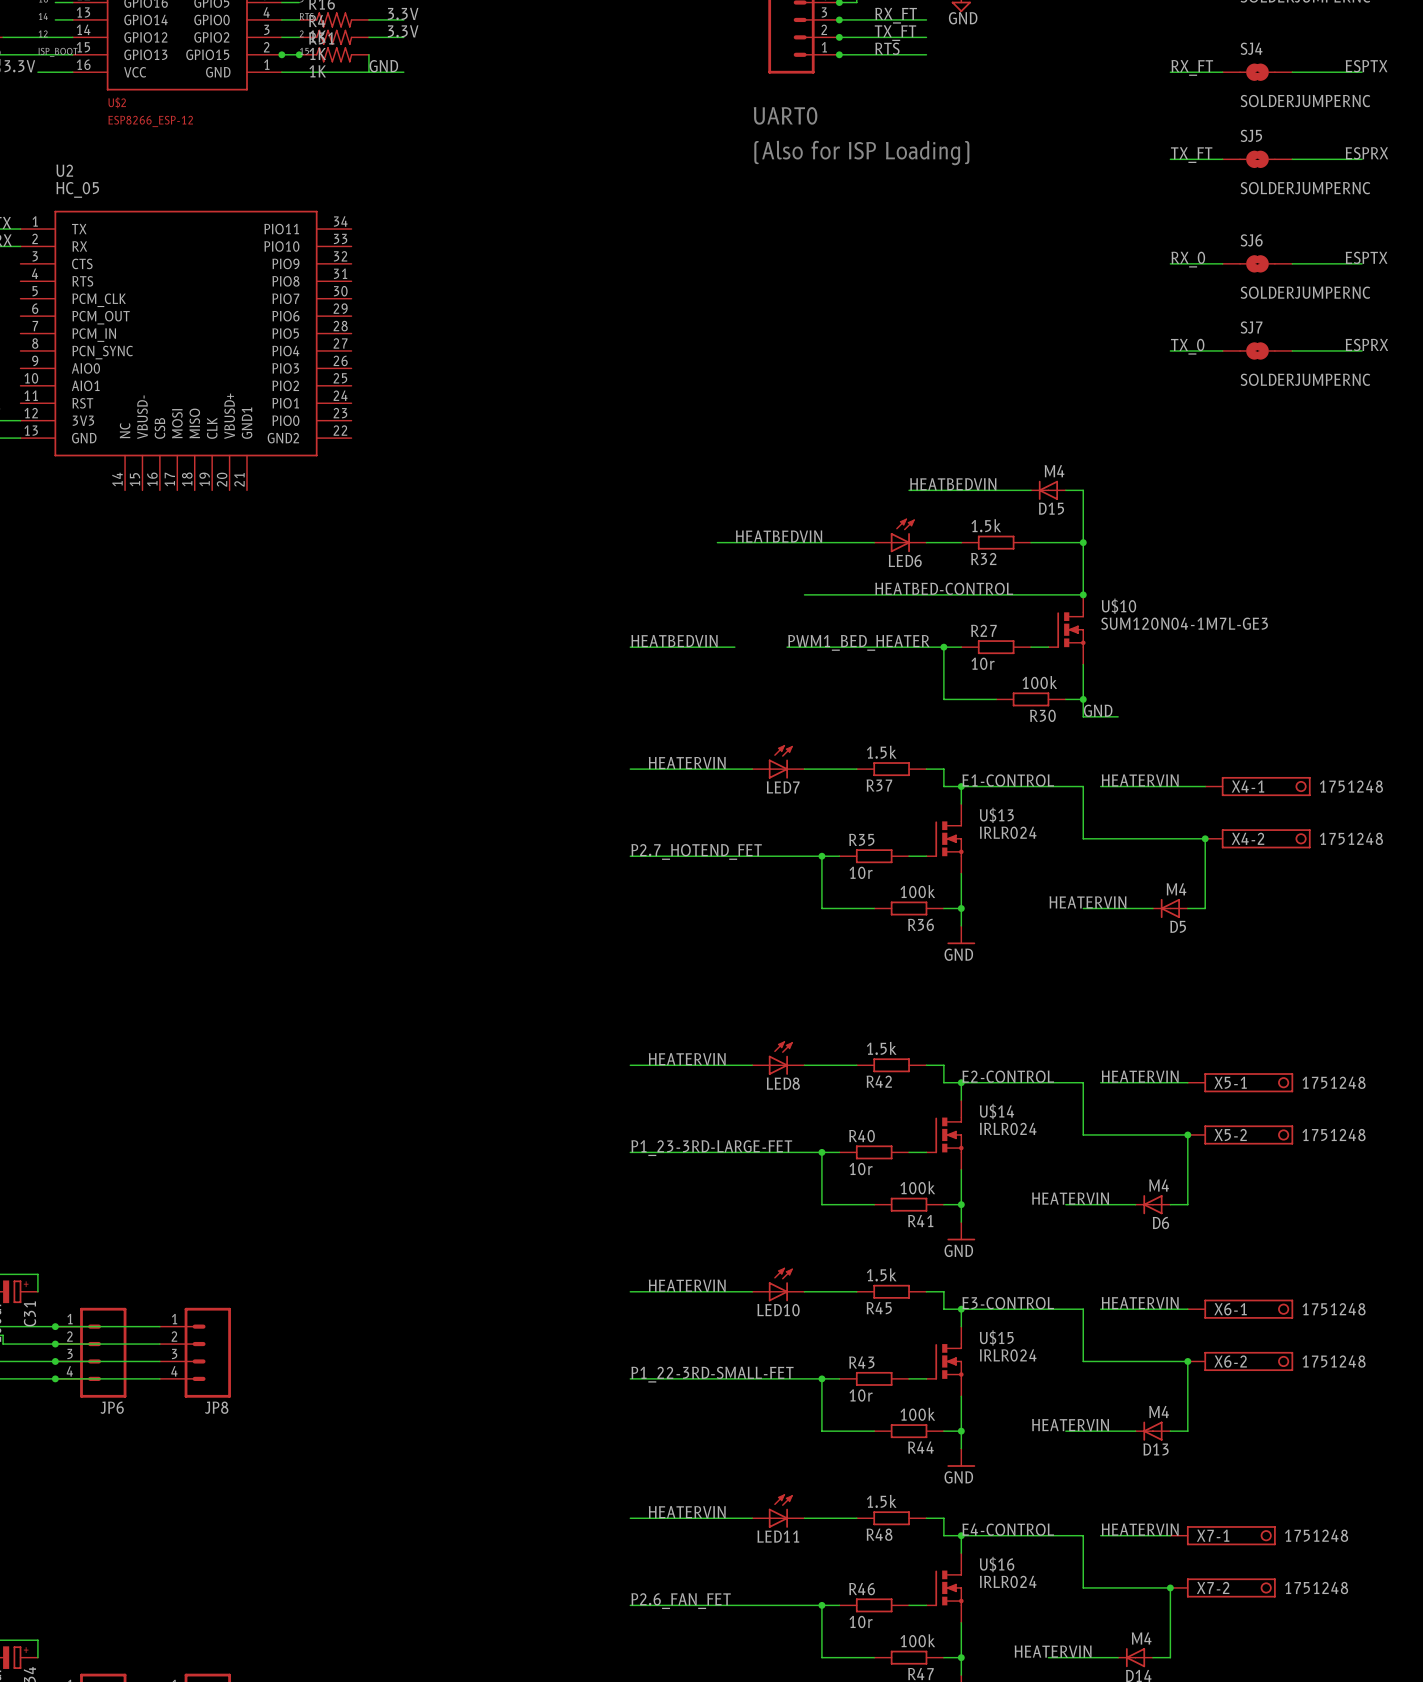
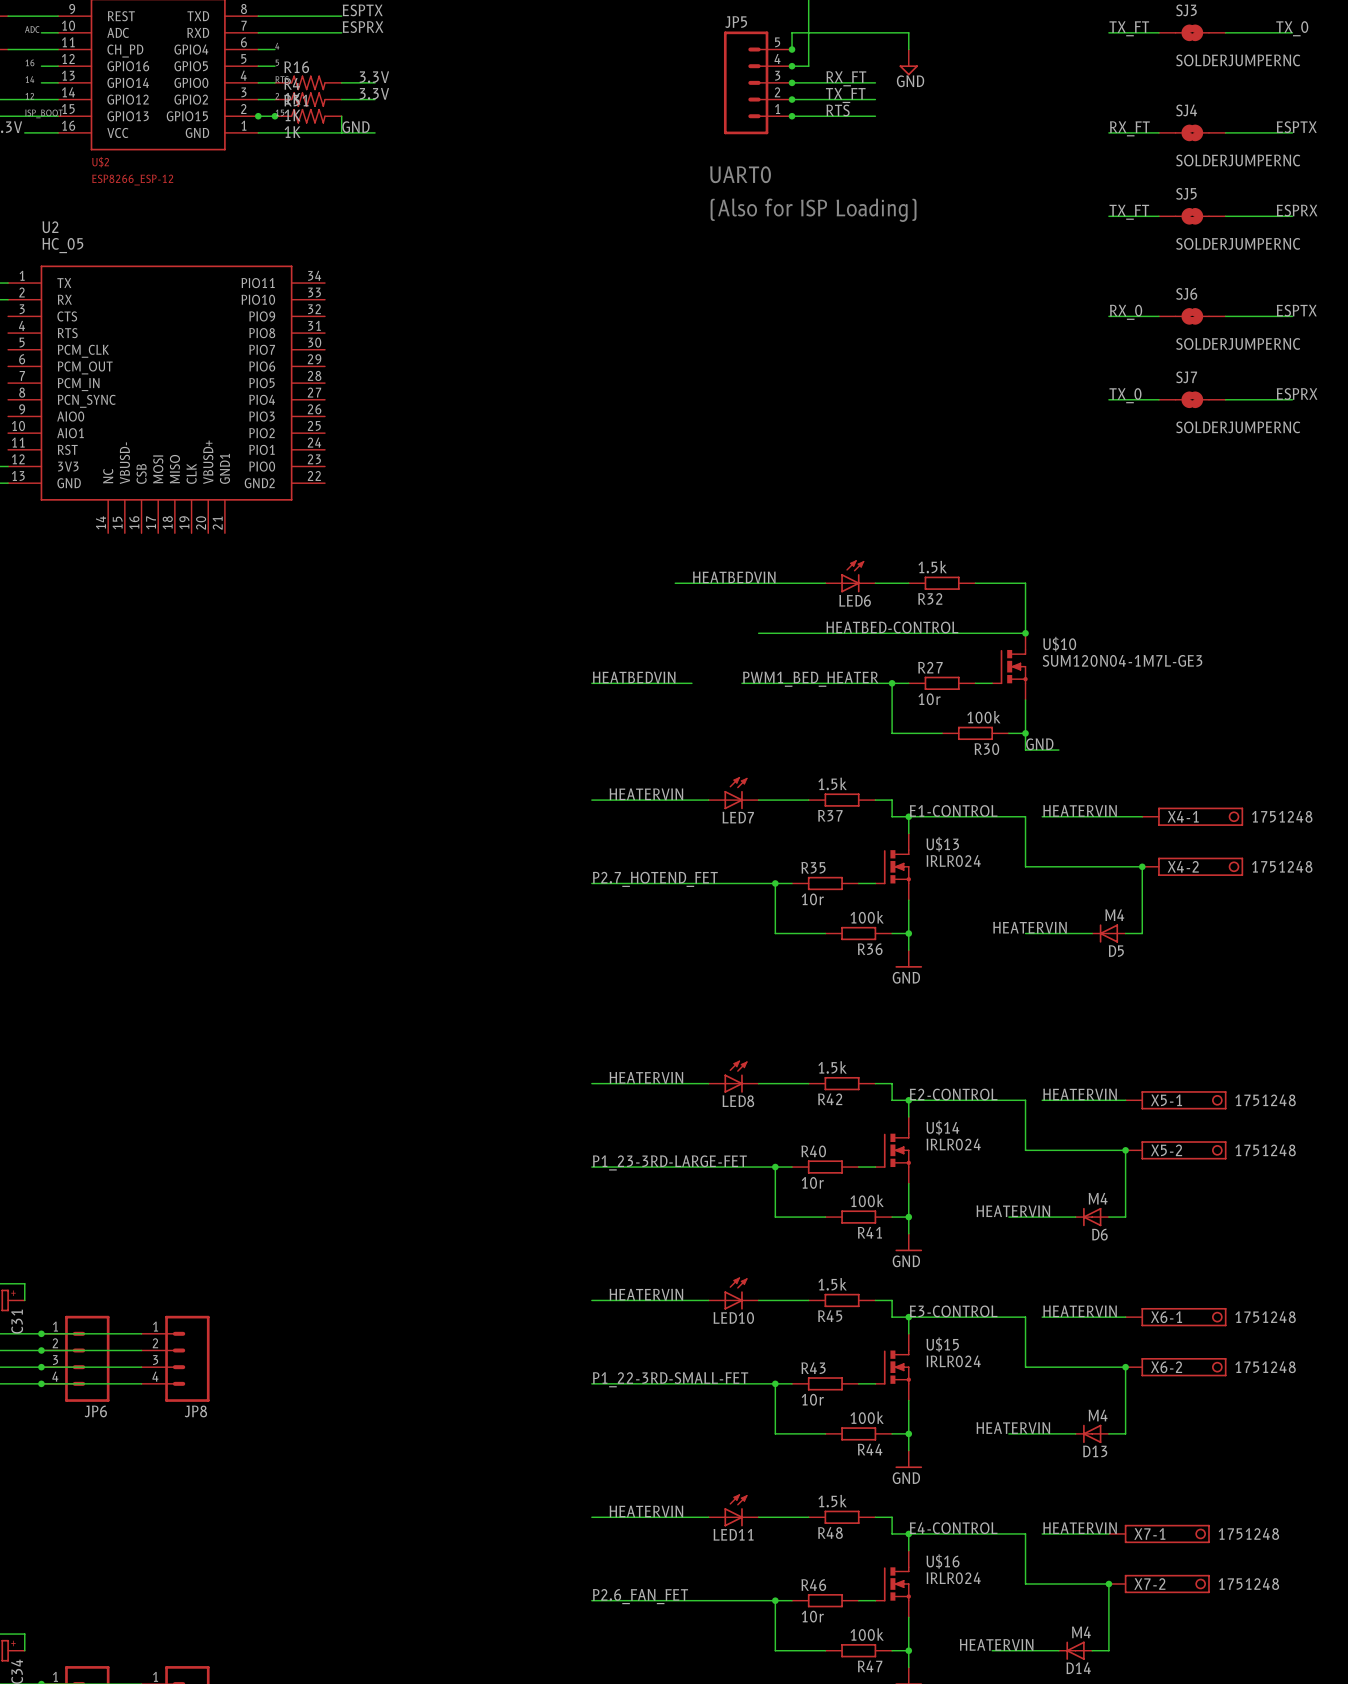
label: HEATBEDVIN (953, 484) -> none
wire: (909, 490) (1031, 490) -> none
D15: M4 (1048, 490) -> none
wire: (1065, 490) (1083, 490) (1083, 542) -> none
junction: (1083, 542) -> none

